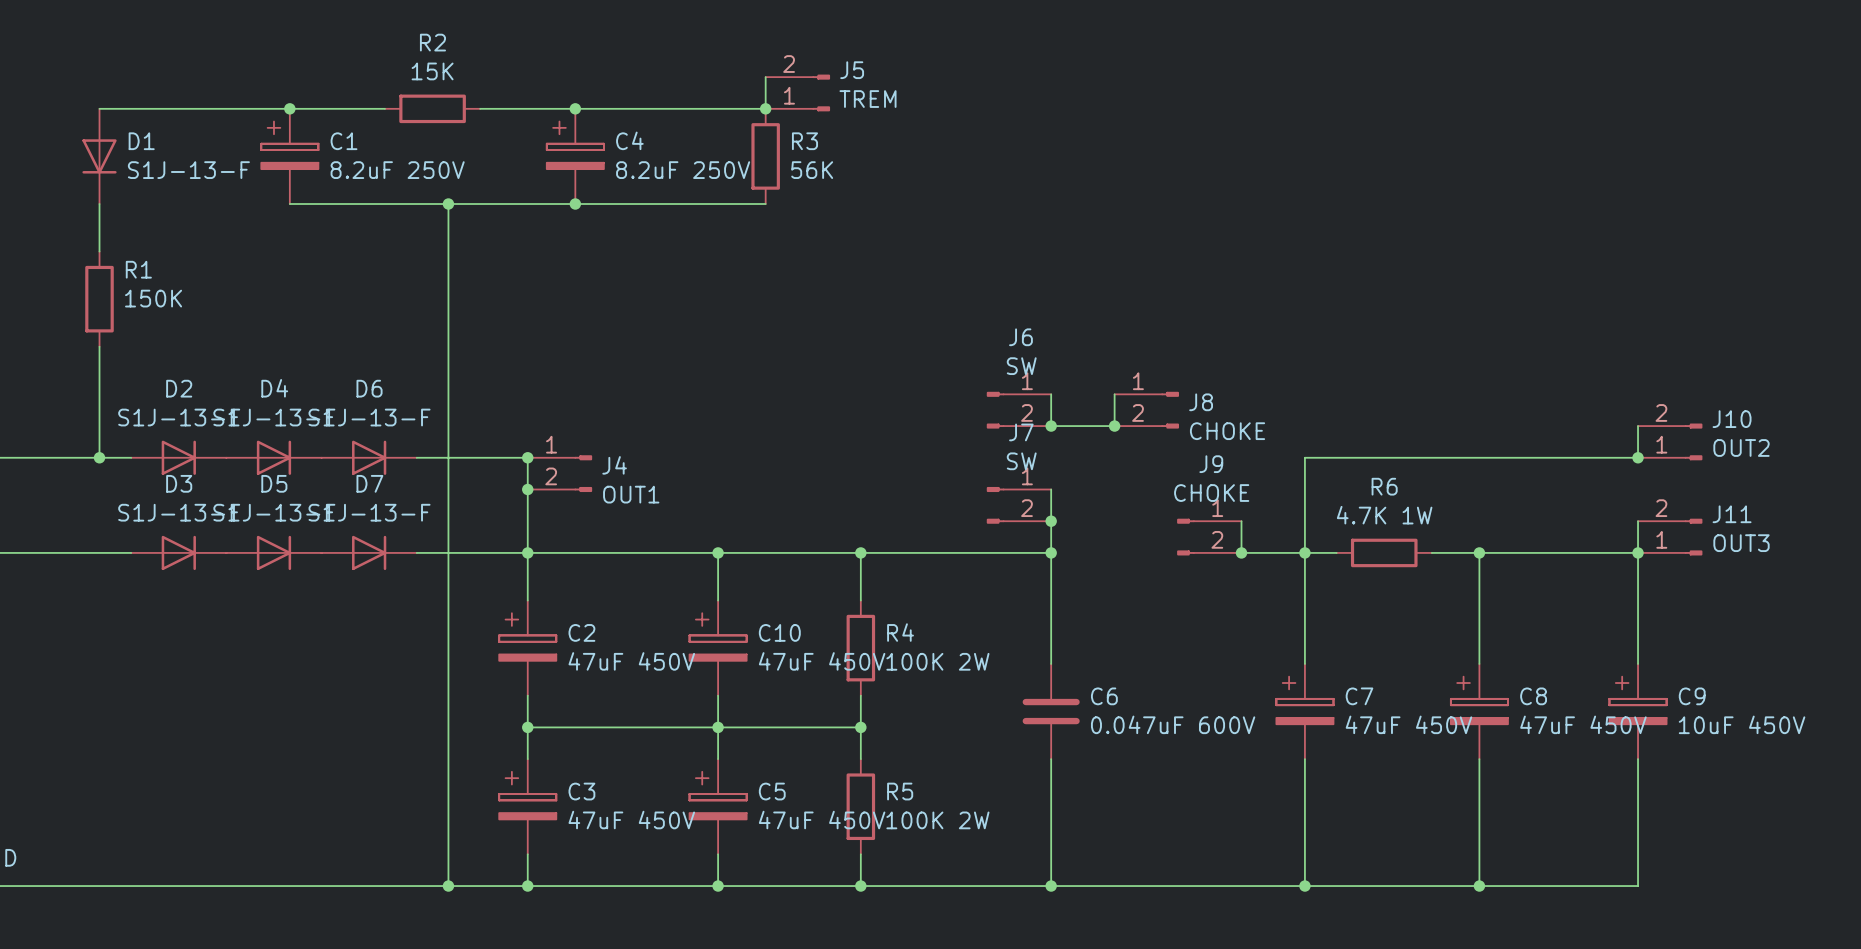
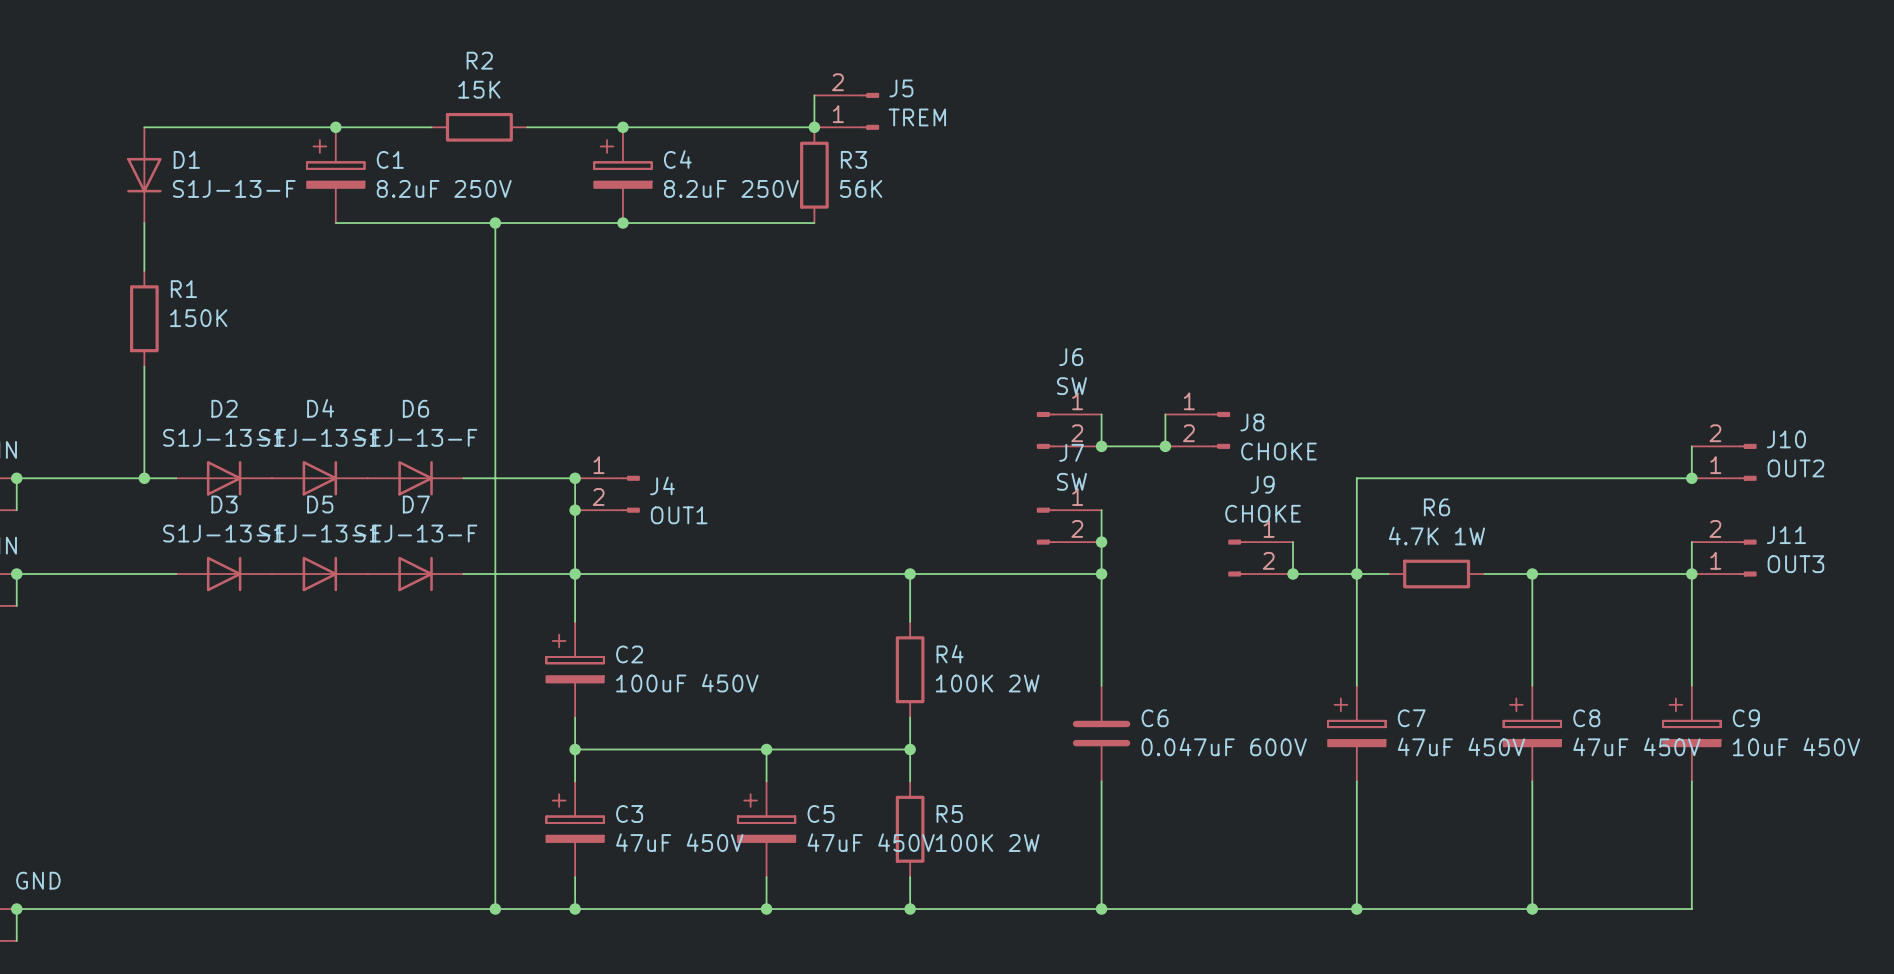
wire: (718, 552) (718, 600) -> none
junction: (718, 552) -> none
C10: 47uF 450V (718, 648) -> none
C2 value: 47uF 450V (631, 661) -> 100uF 450V (687, 683)
wire: (718, 695) (718, 727) -> none

